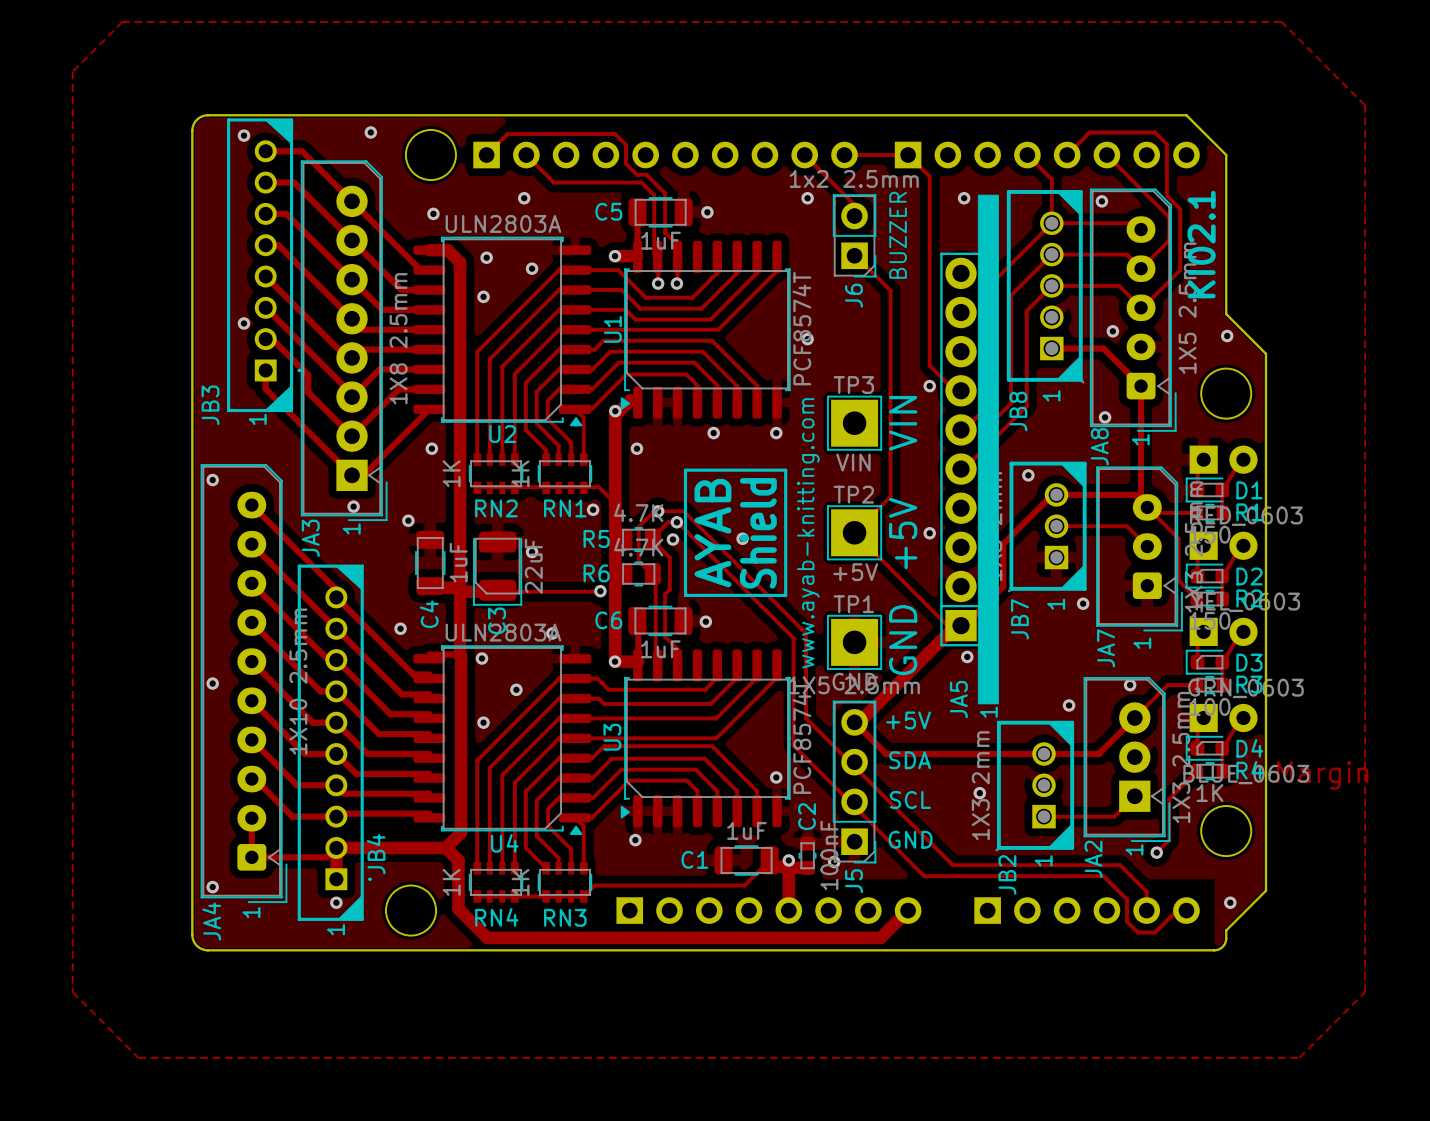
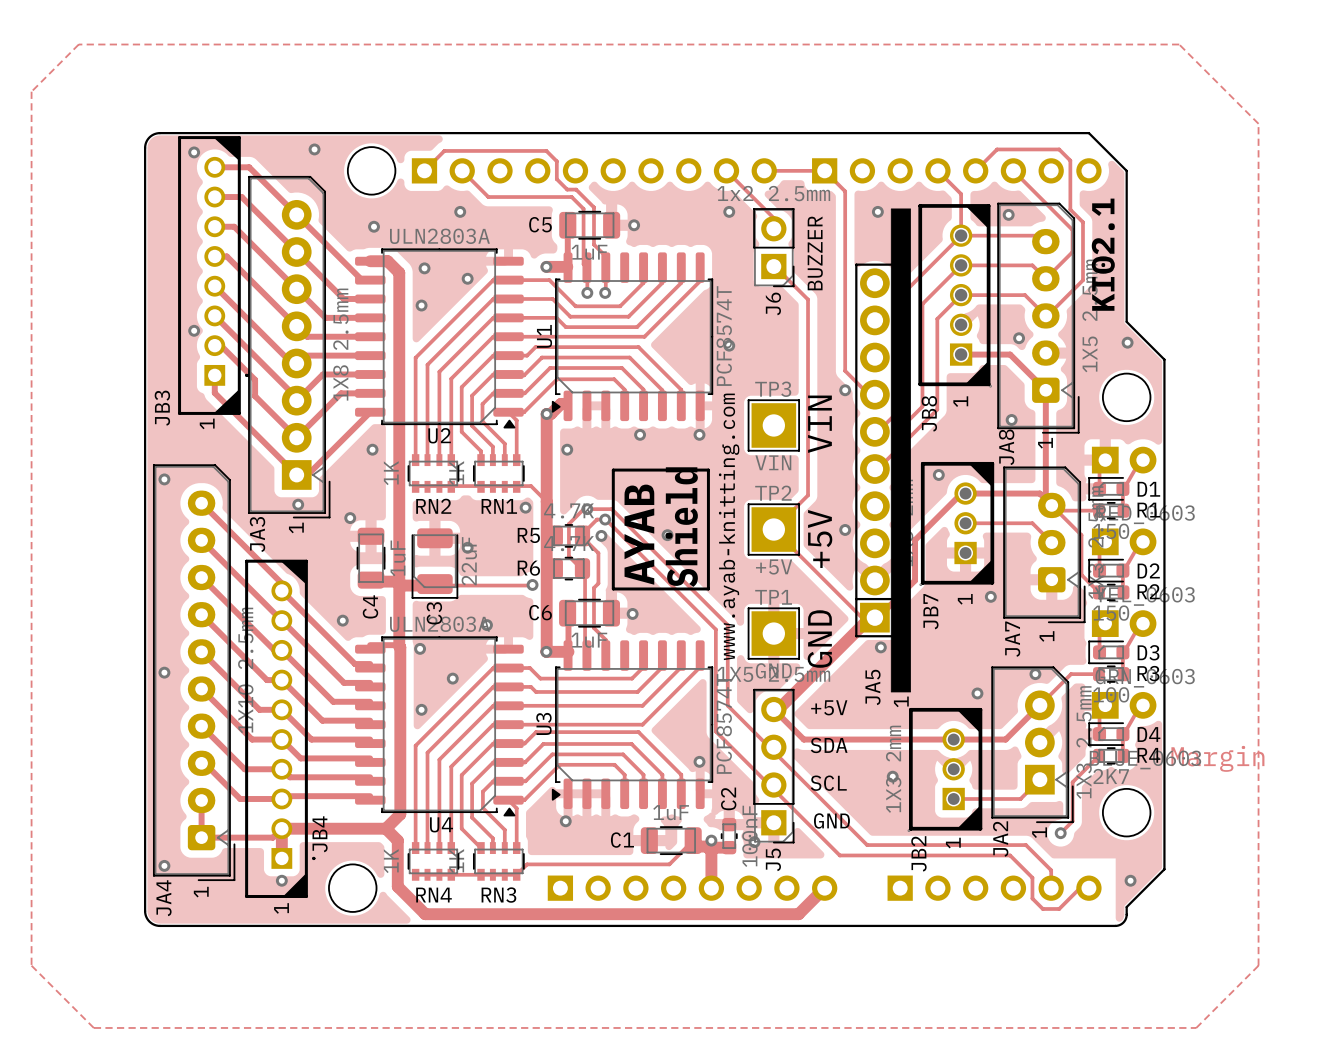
R4 value: 1K (1209, 793) -> 2K7 (1111, 776)

